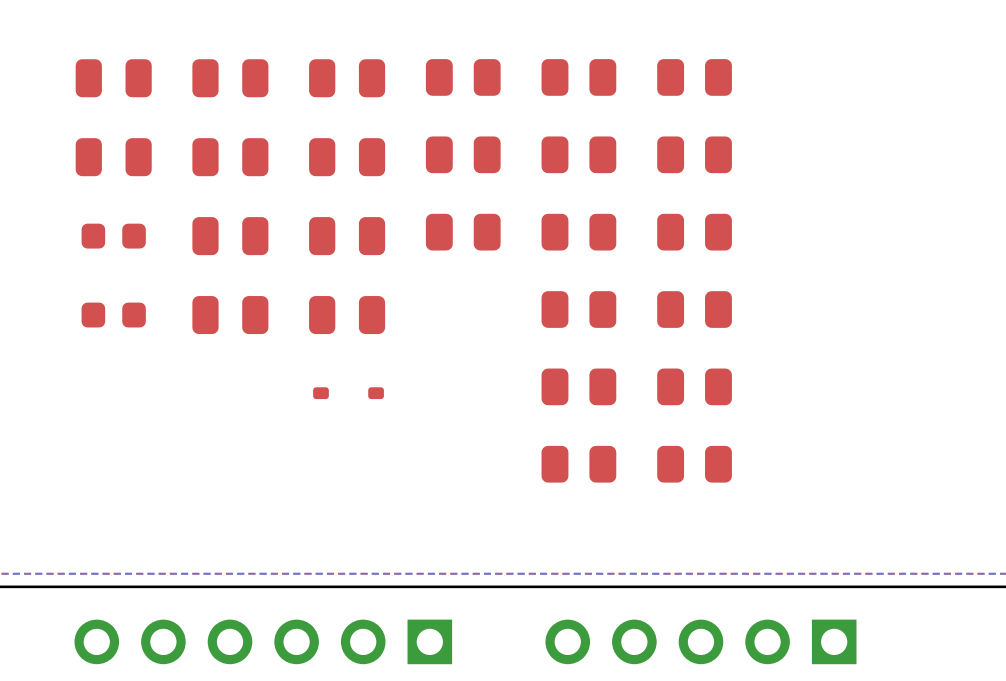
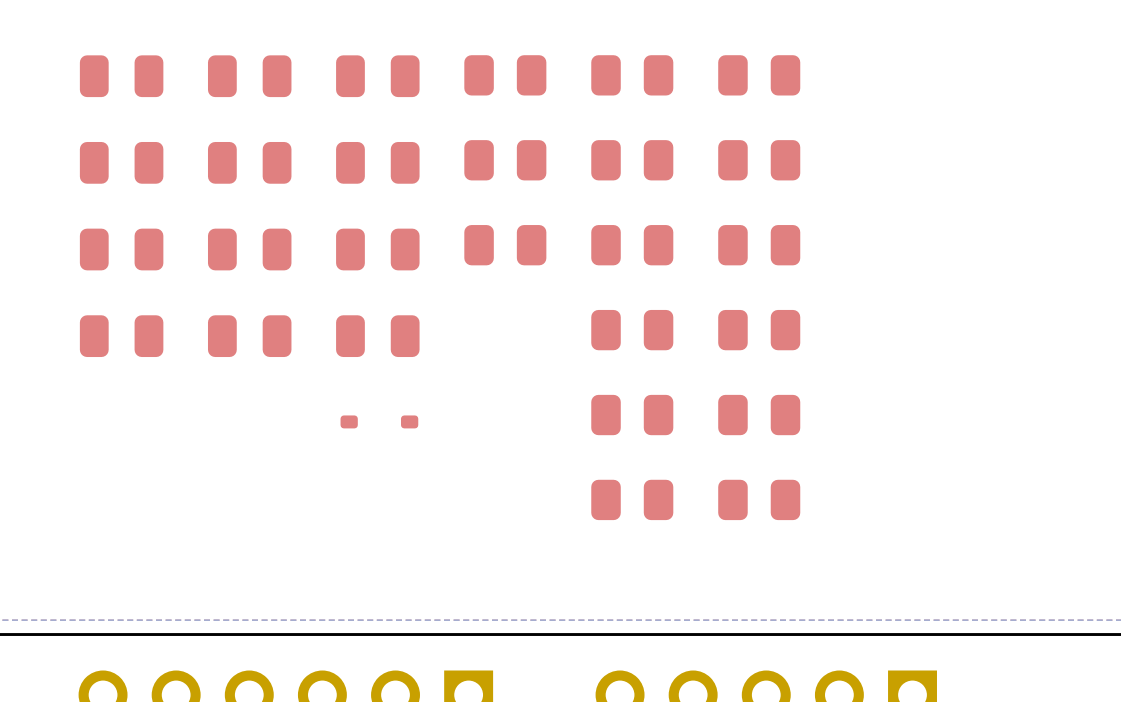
part footprint: [81, 223, 146, 249] -> [79, 228, 164, 271]
part footprint: [81, 302, 146, 328] -> [79, 315, 164, 358]

